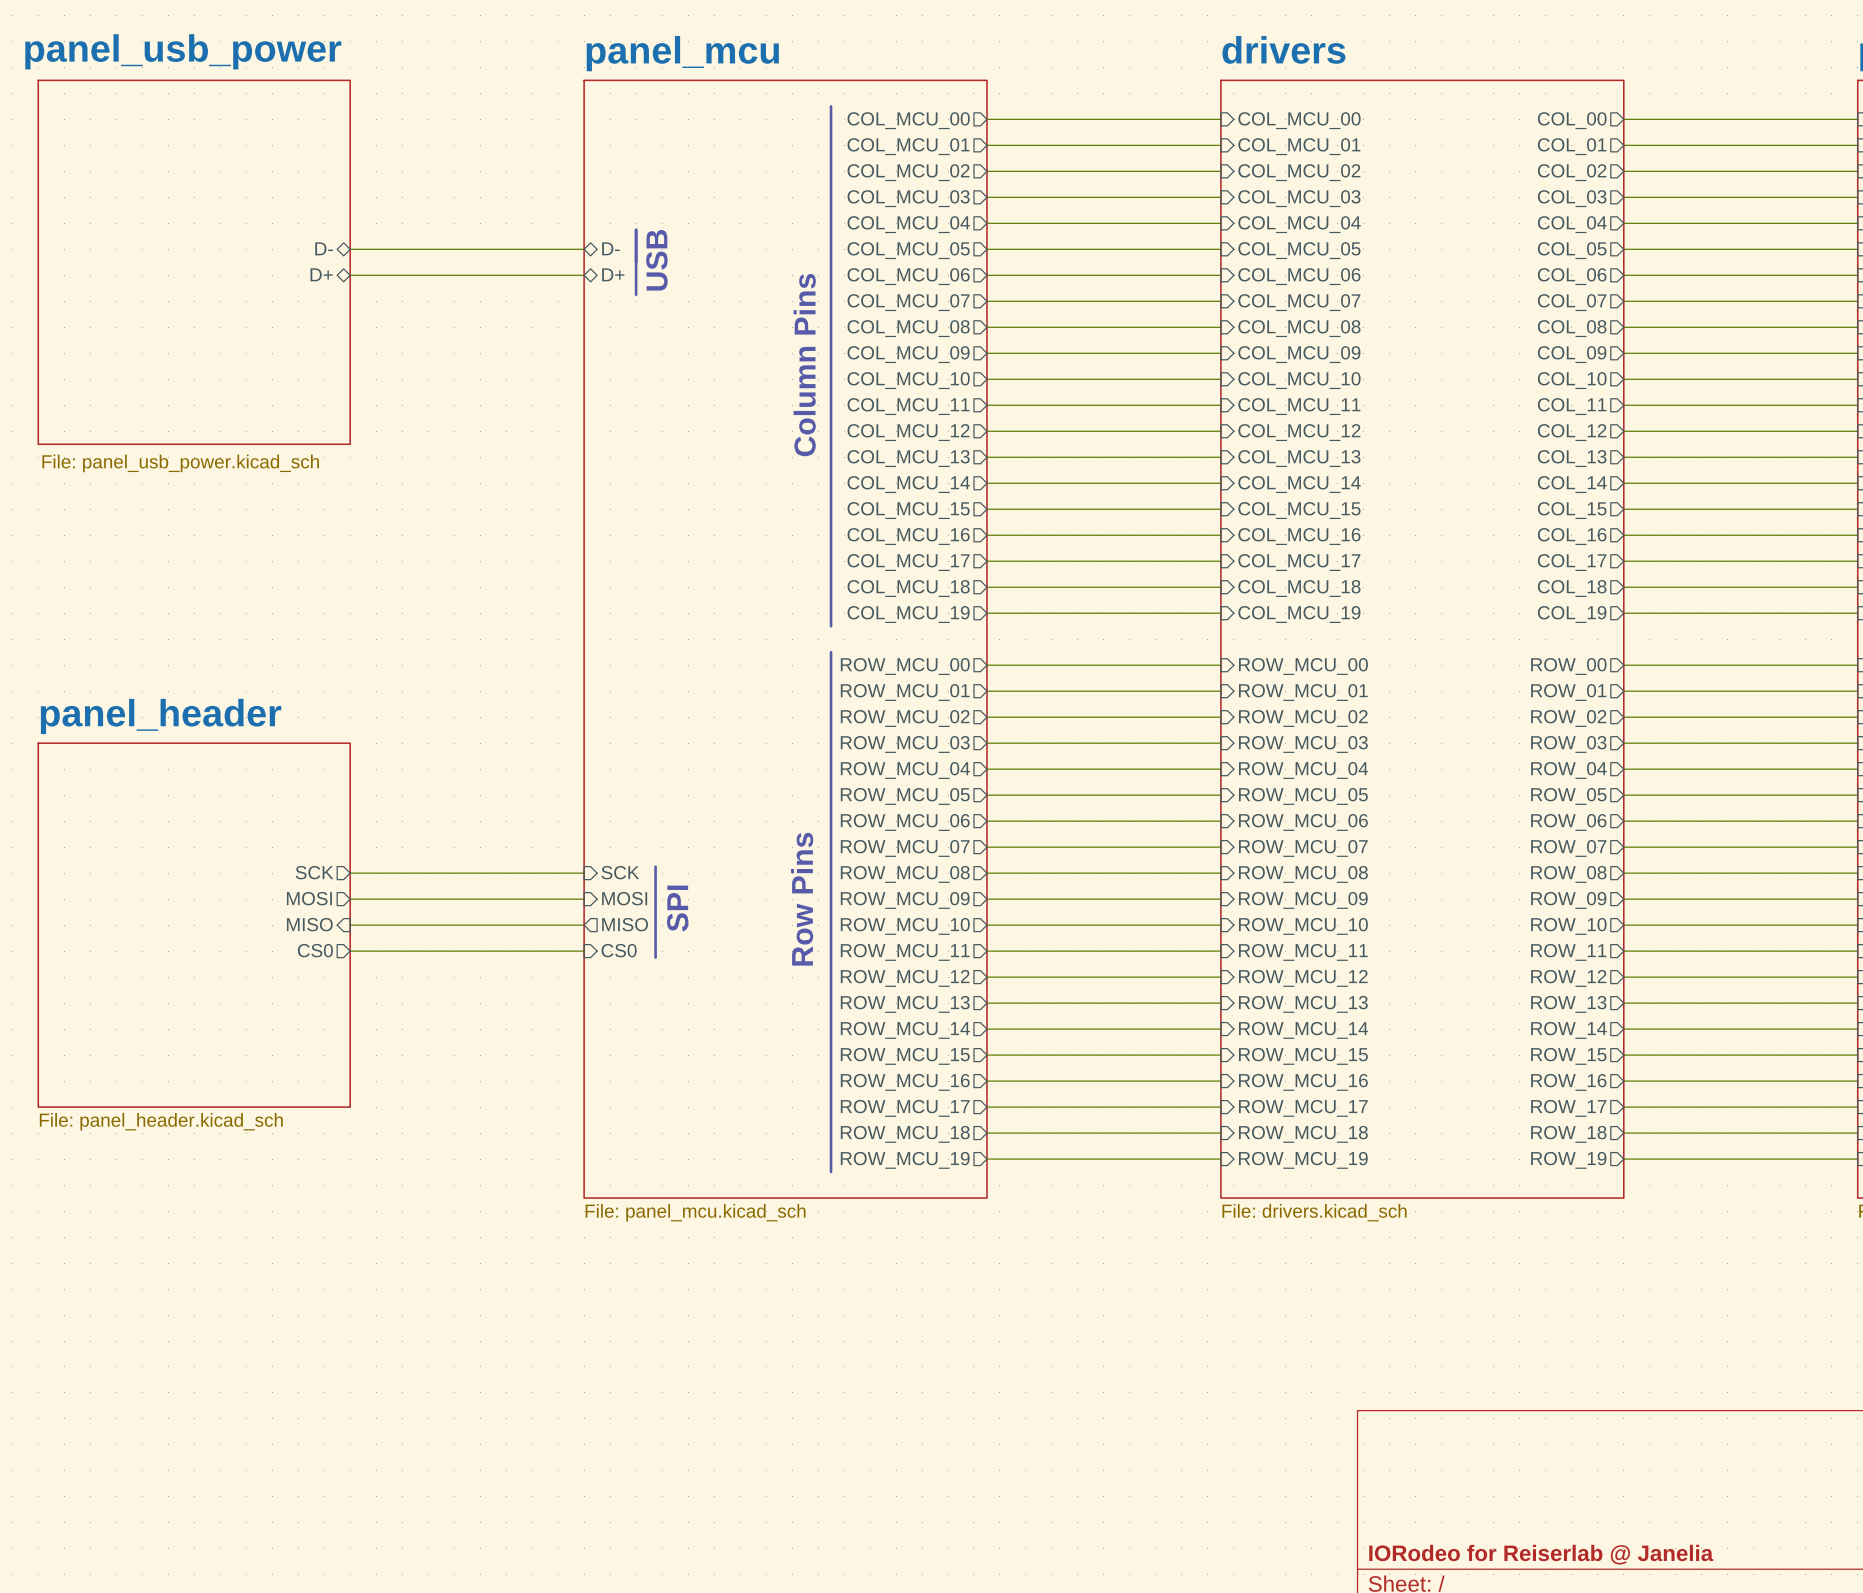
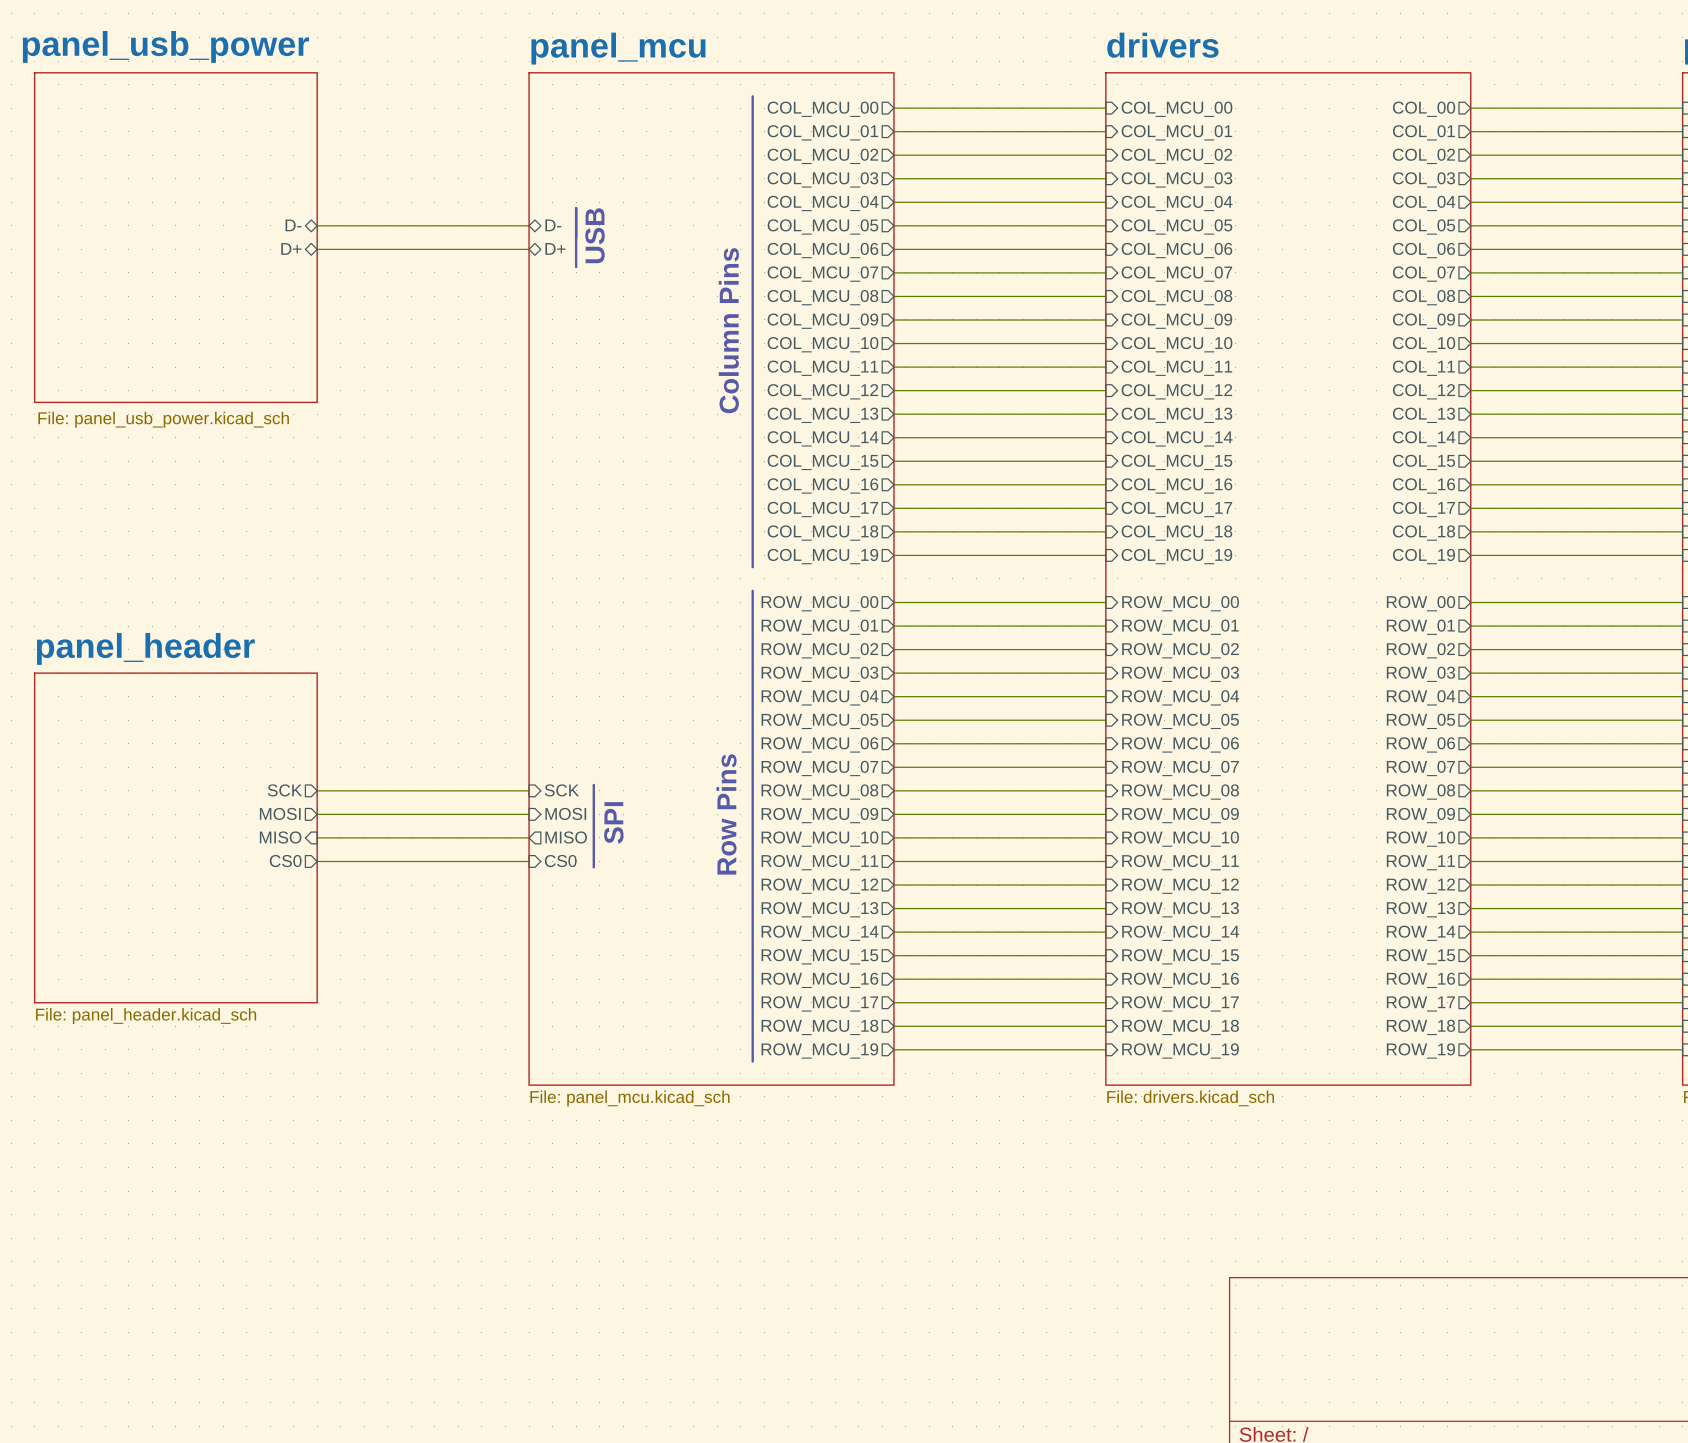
title block: IORodeo for Reiserlab @ Janelia (1541, 1554) -> none

